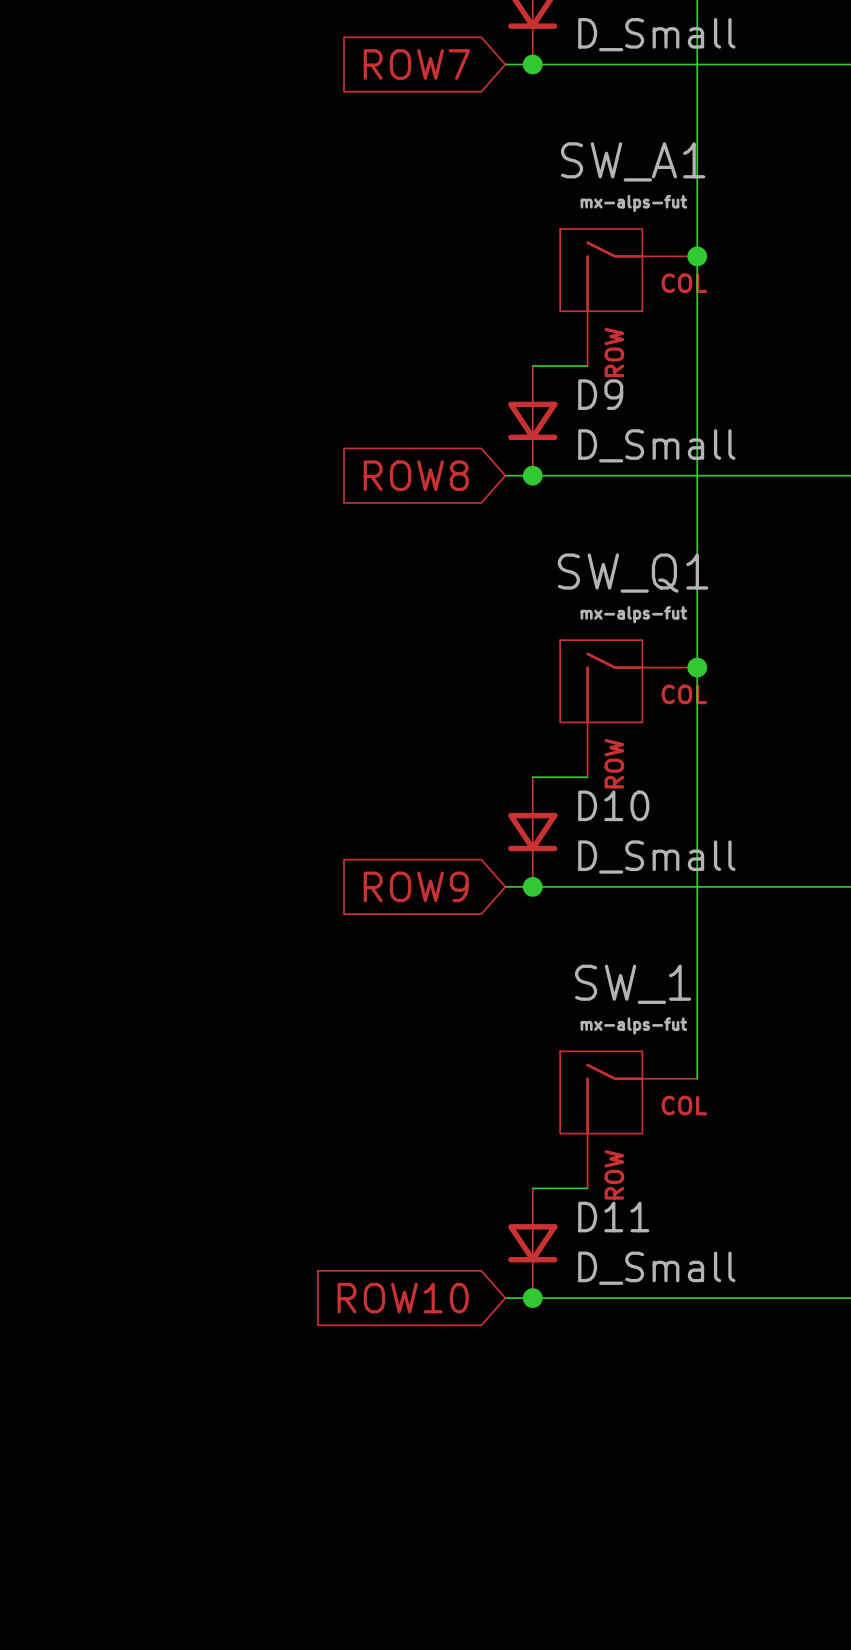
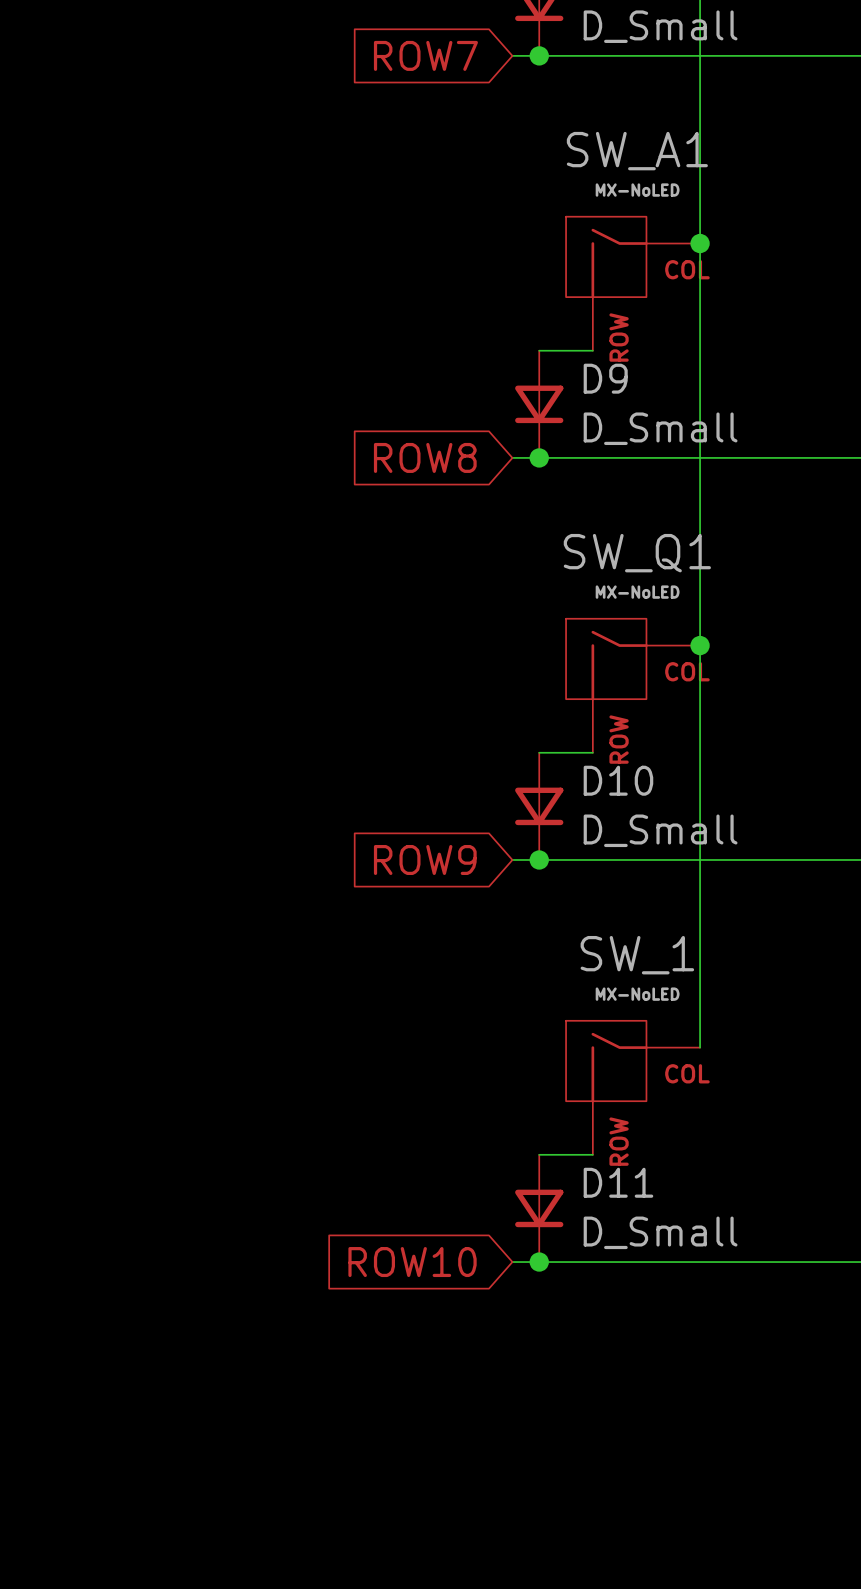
SW_A1 value: mx-alps-fut (633, 203) -> MX-NoLED (637, 190)
SW_Q1 value: mx-alps-fut (633, 614) -> MX-NoLED (637, 592)
SW_1 value: mx-alps-fut (633, 1025) -> MX-NoLED (637, 994)

